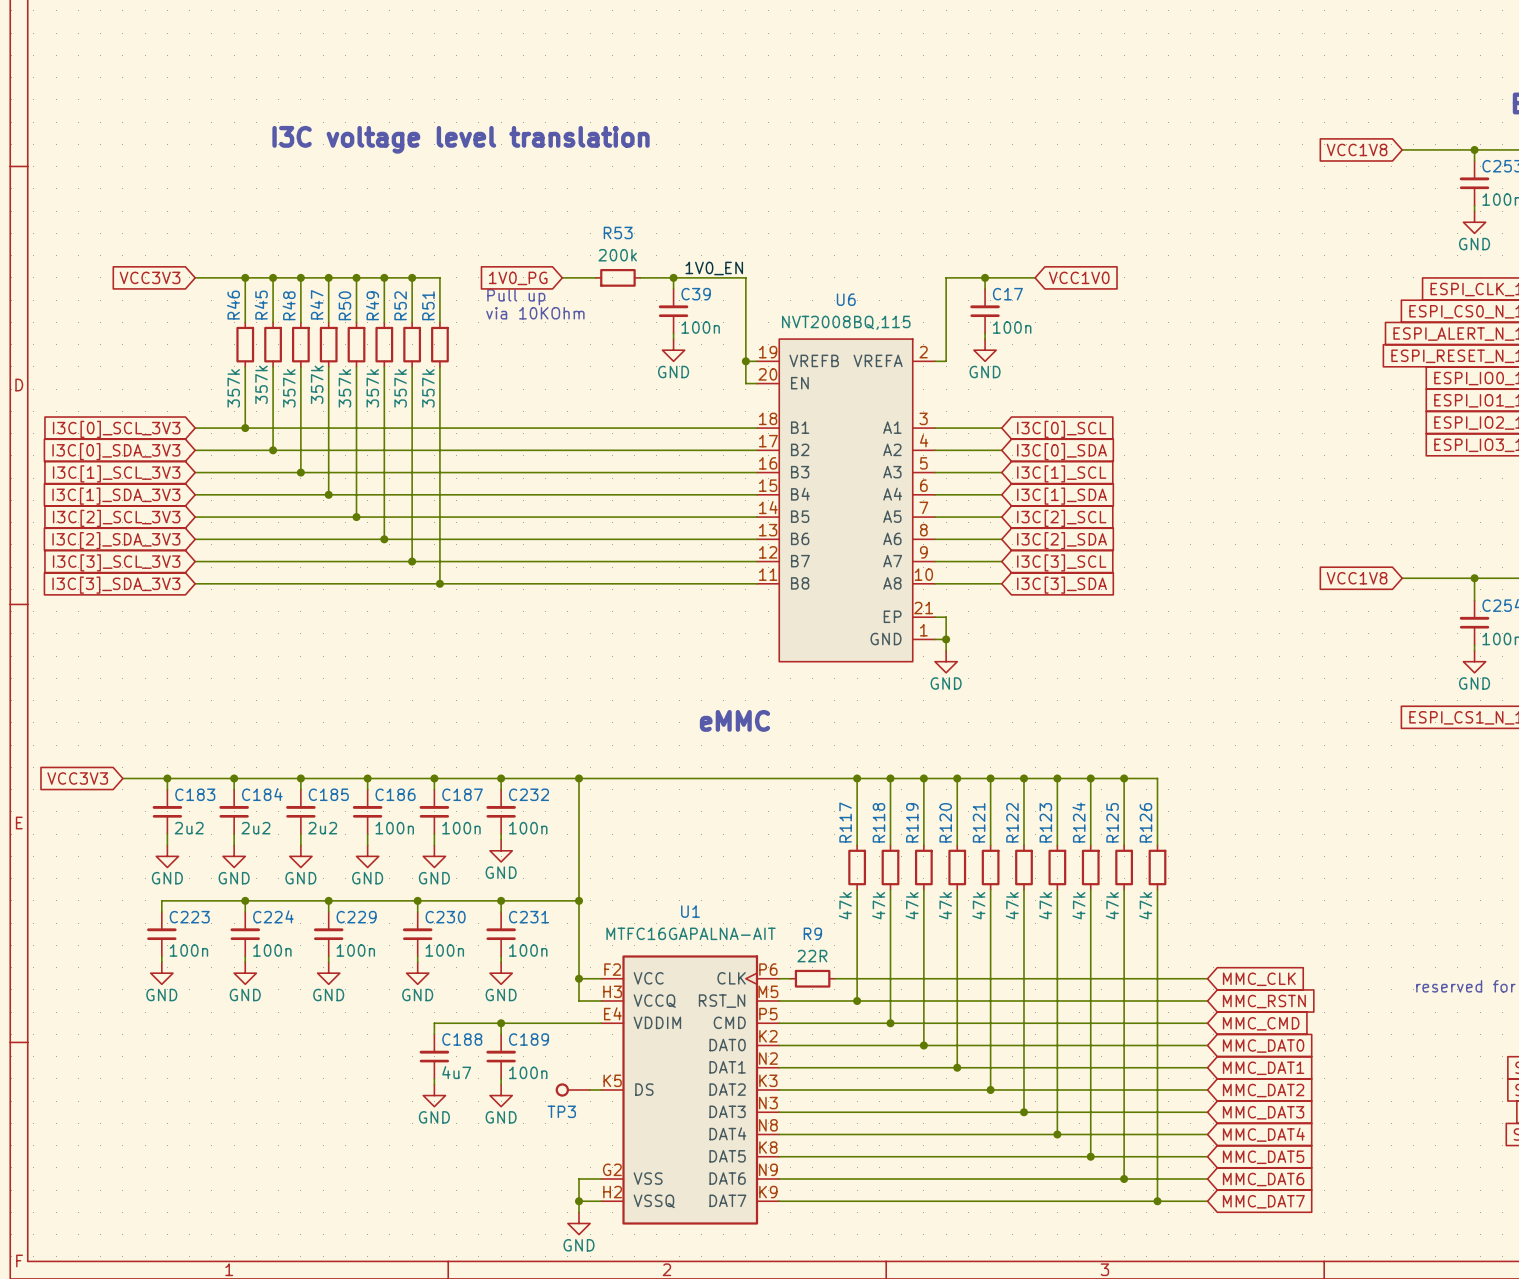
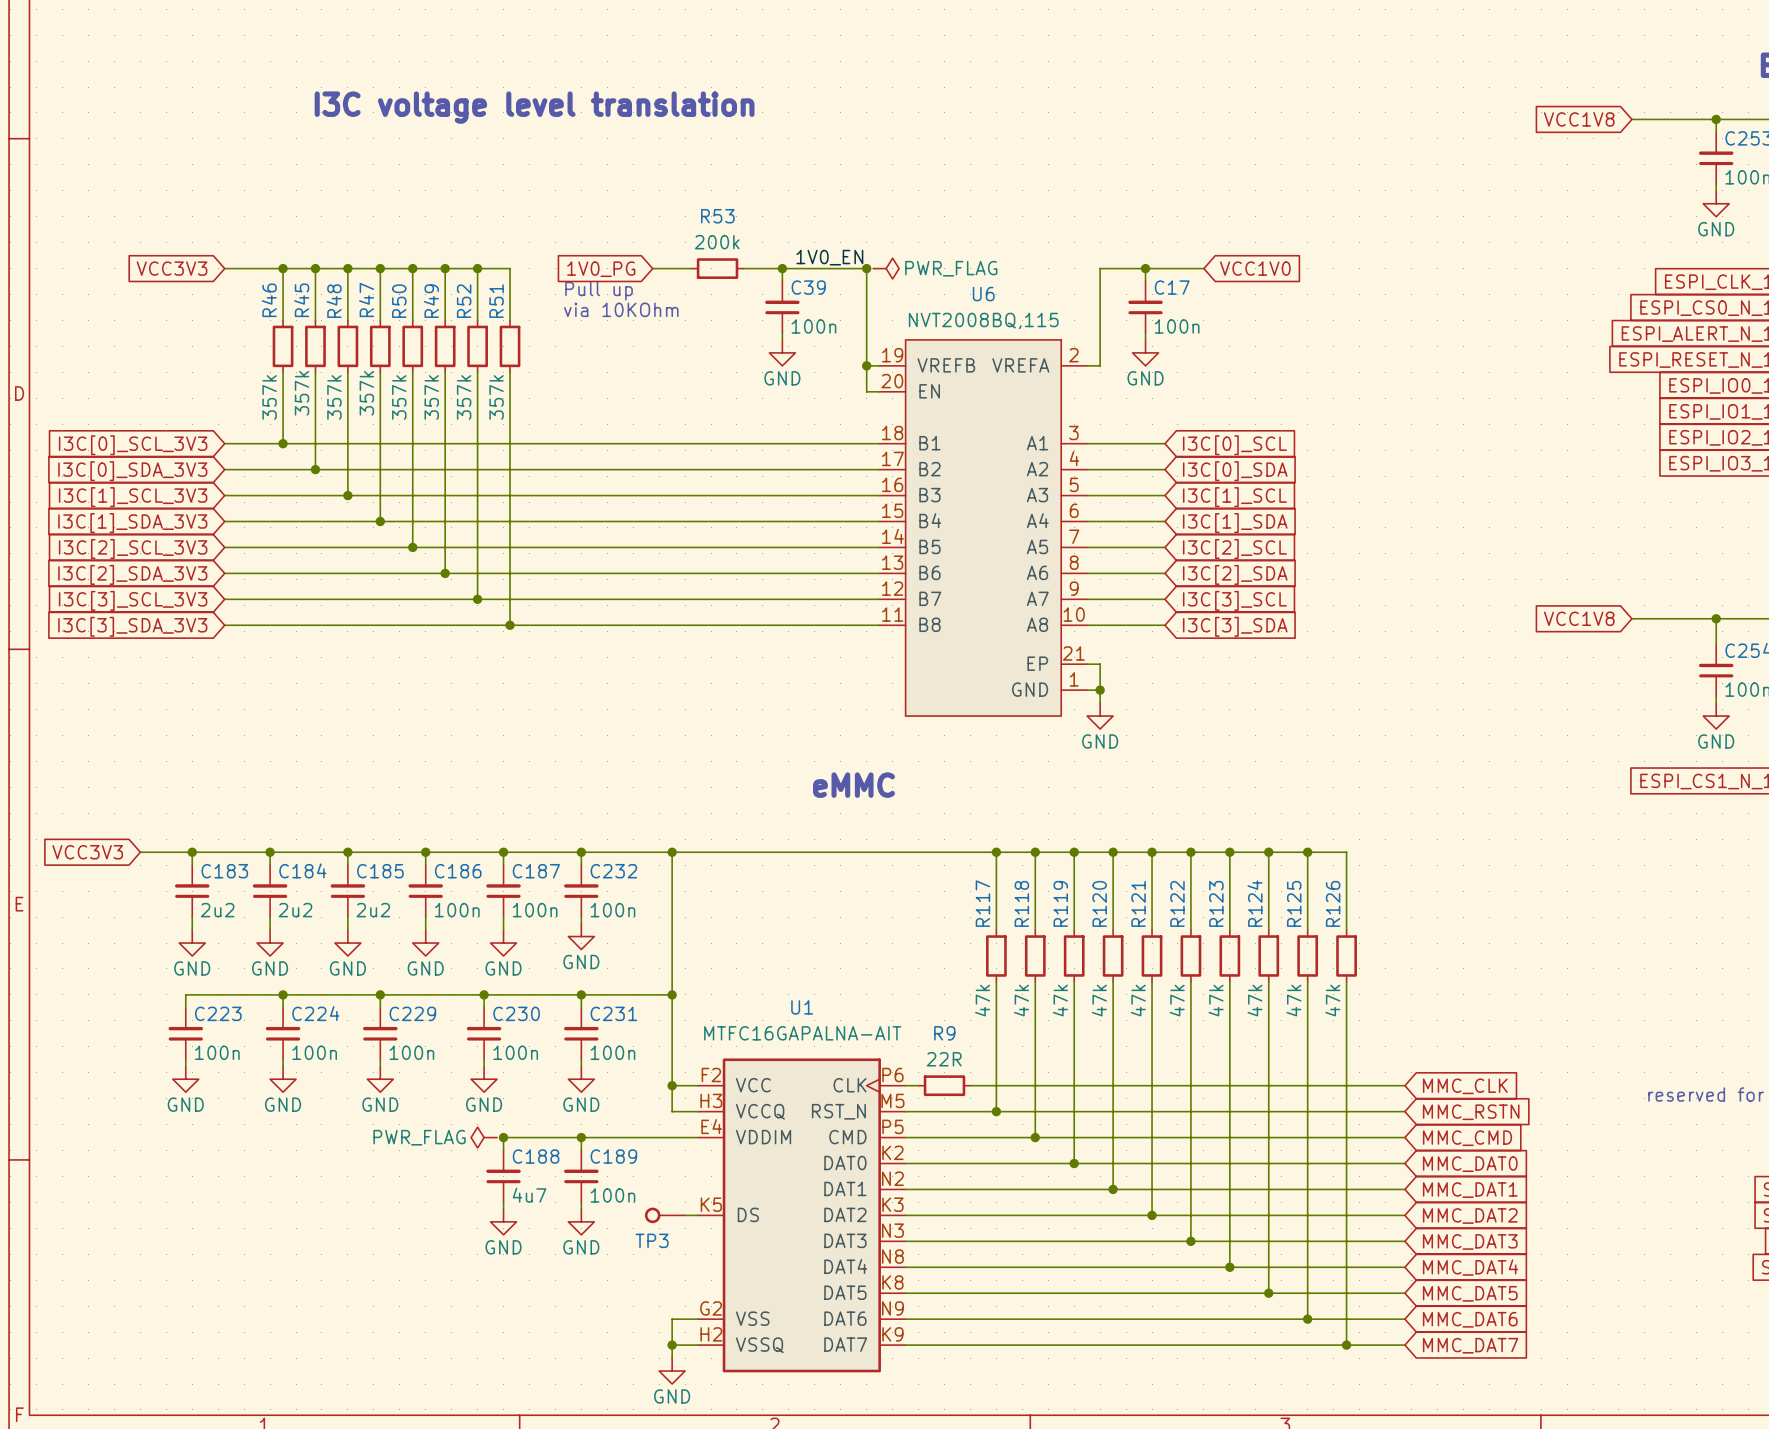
junction: none -> (866, 268)
power symbol: none -> PWR_FLAG (886, 268)
power symbol: none -> PWR_FLAG (484, 1137)
junction: none -> (503, 1137)

